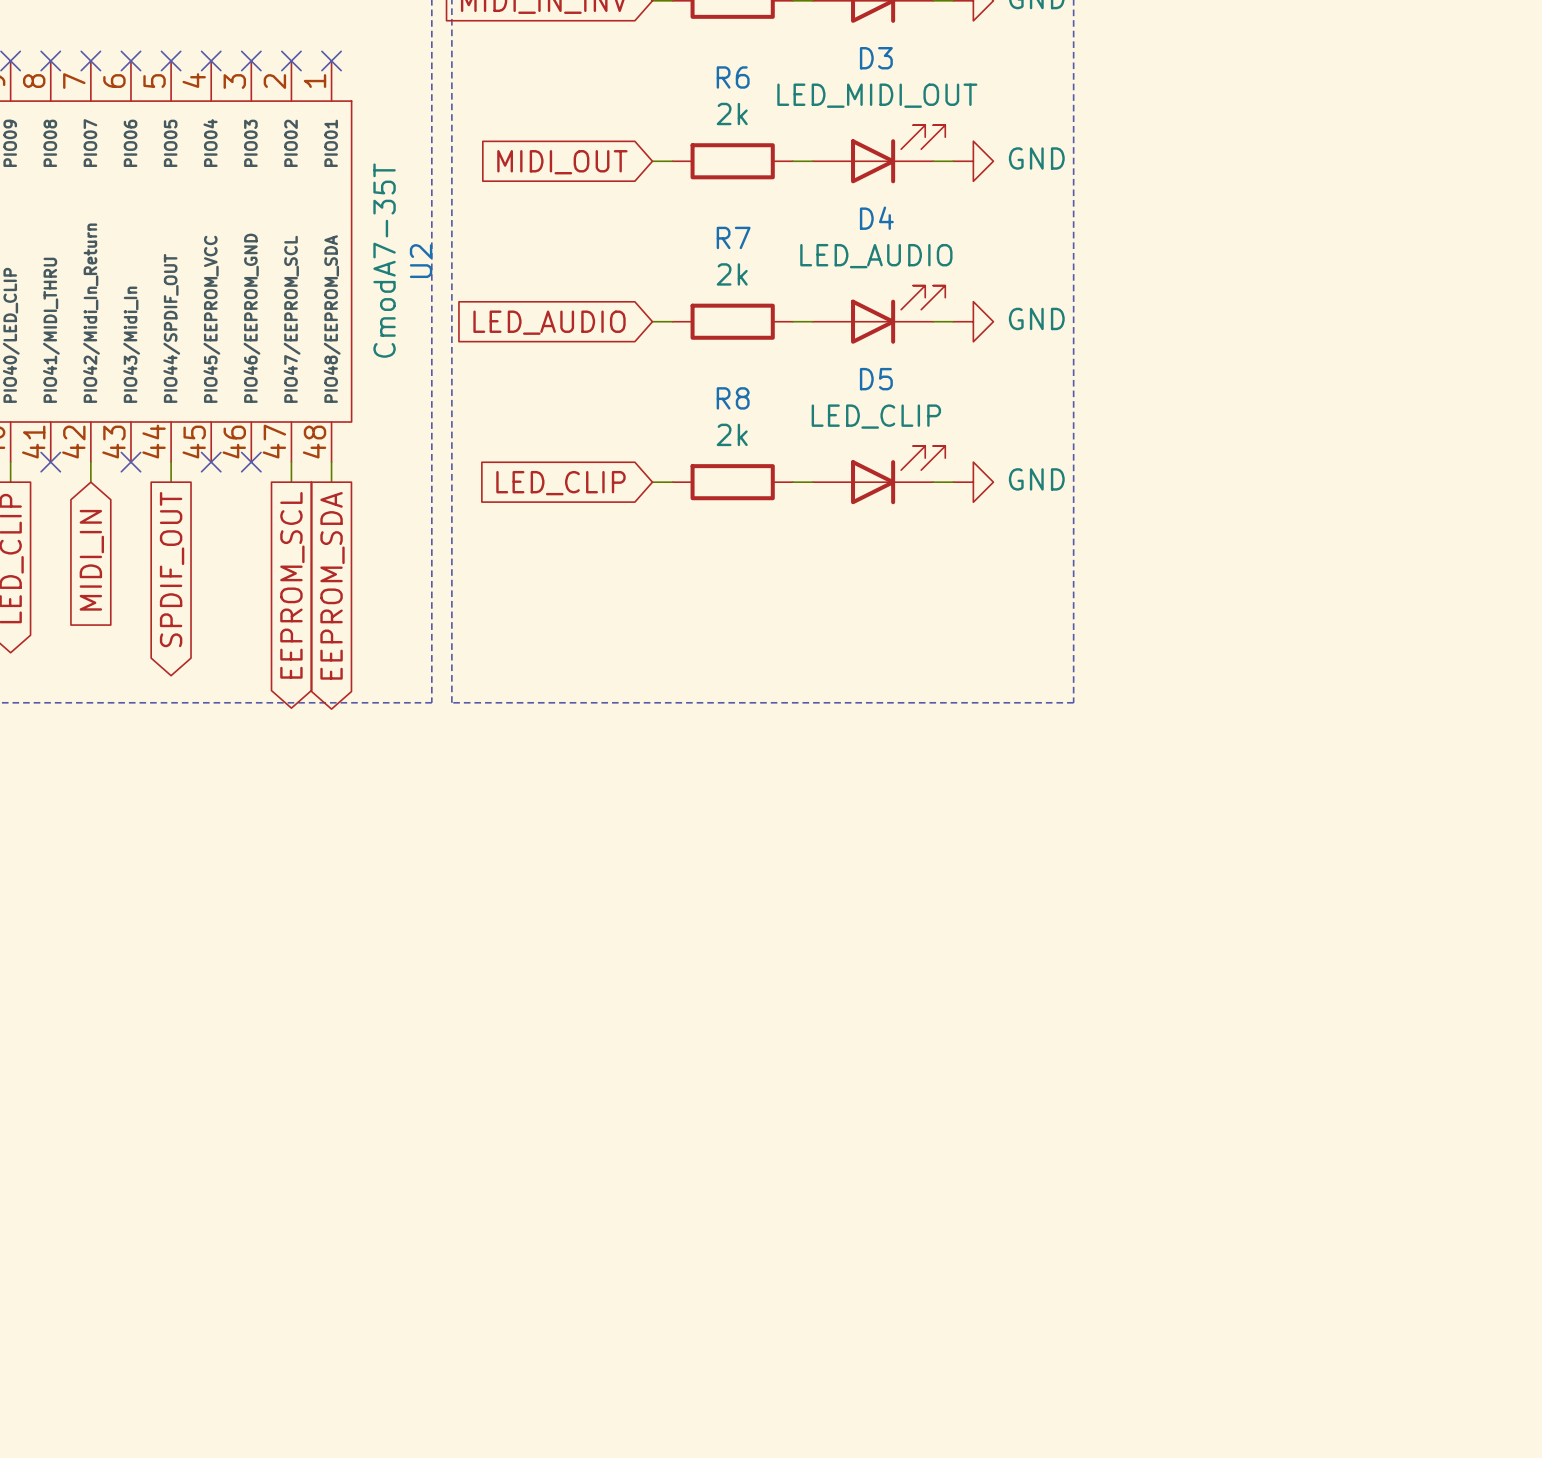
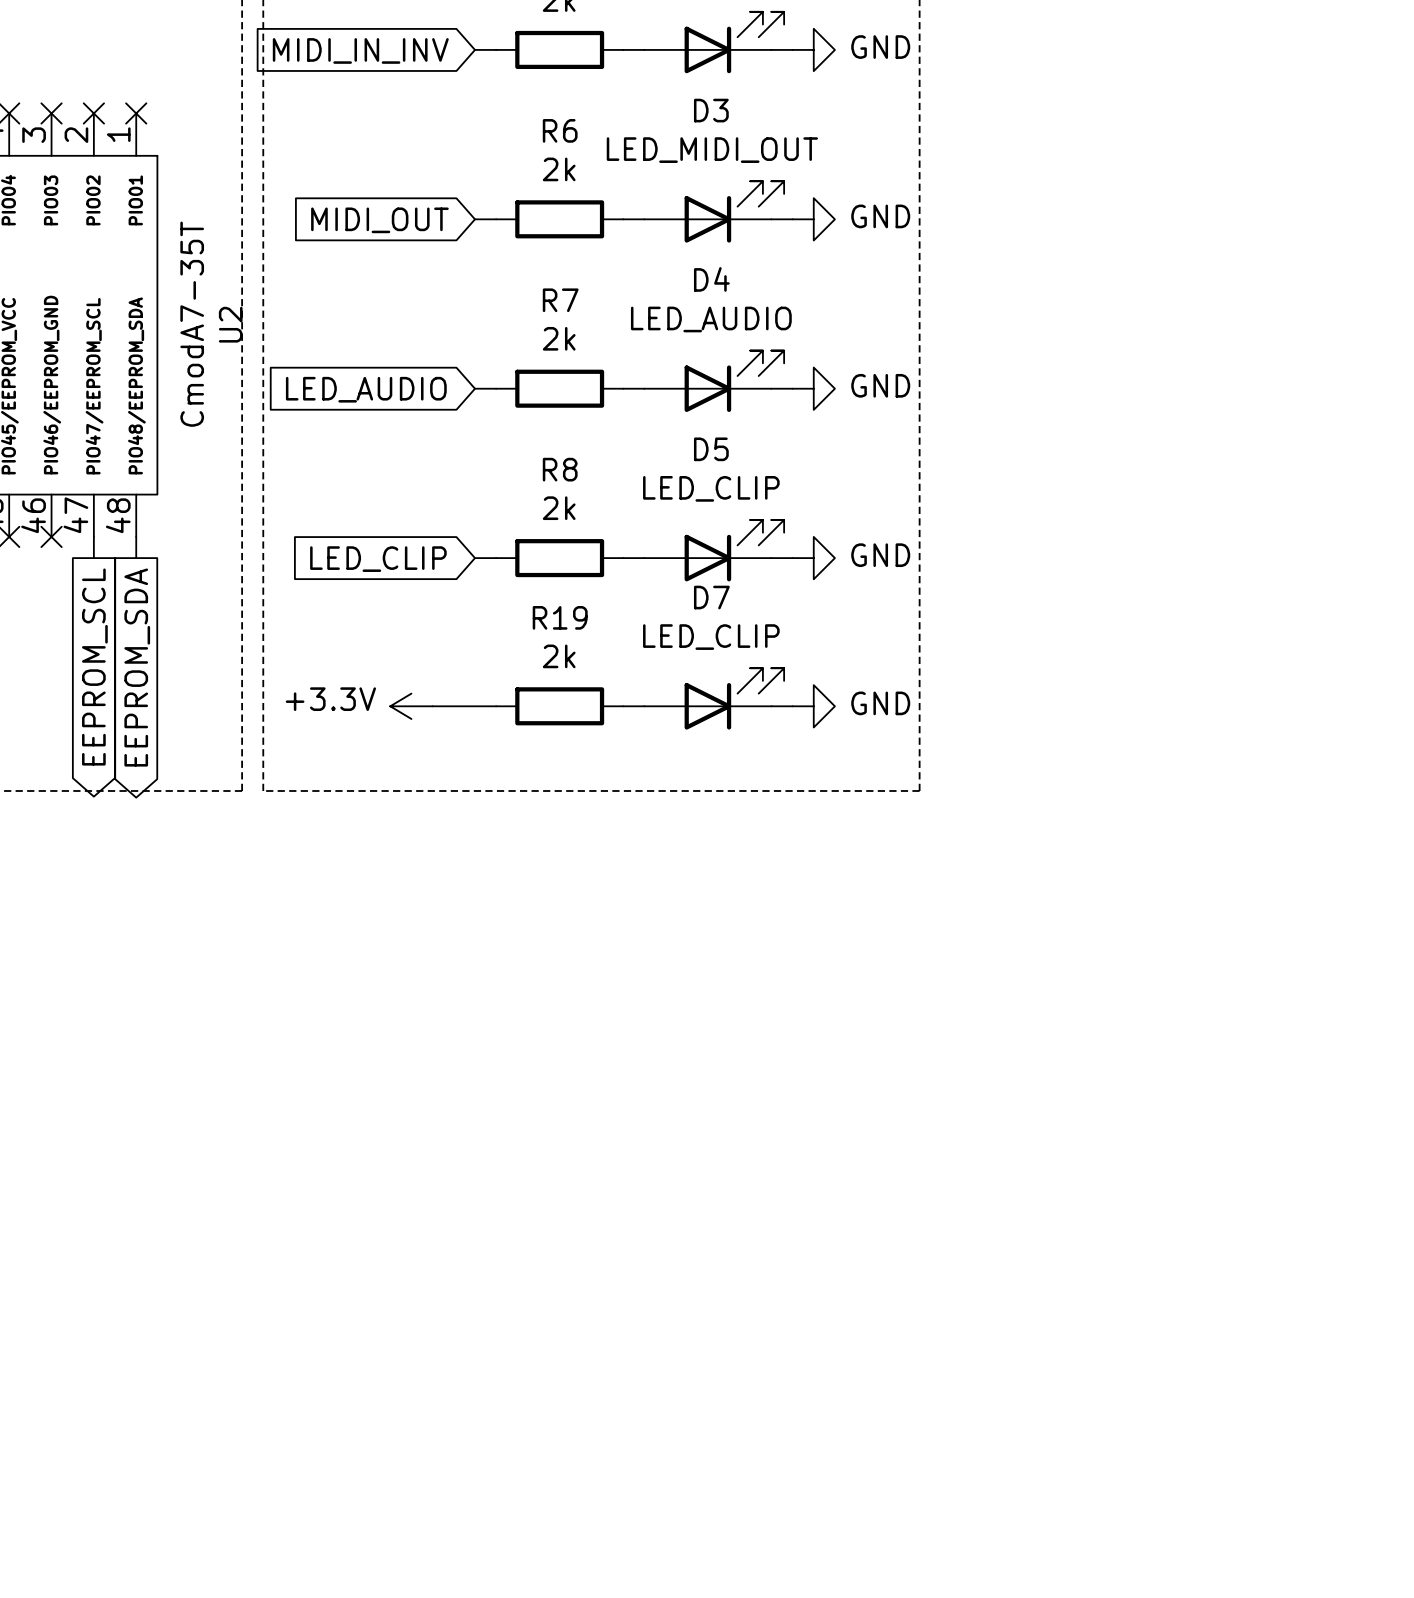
D7: none -> LED_CLIP (714, 698)
power symbol: none -> +3.3V (411, 706)
wire: none -> (432, 706) (496, 706)
R19: none -> 2k (559, 706)
wire: none -> (623, 706) (644, 706)
wire: none -> (771, 706) (792, 706)
power symbol: none -> GND (813, 706)

